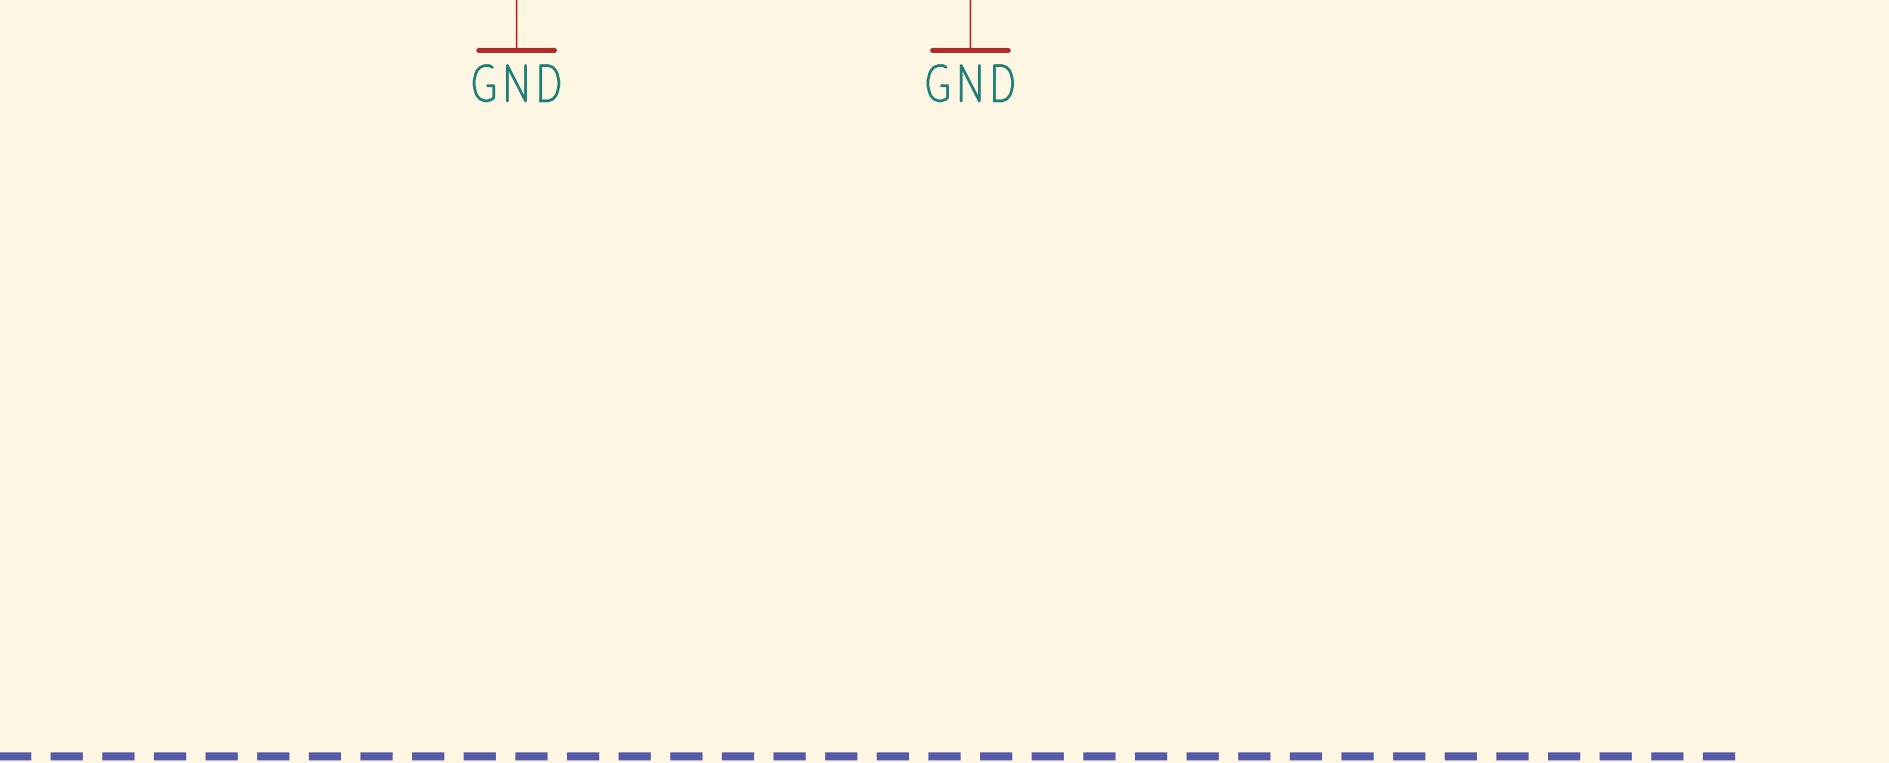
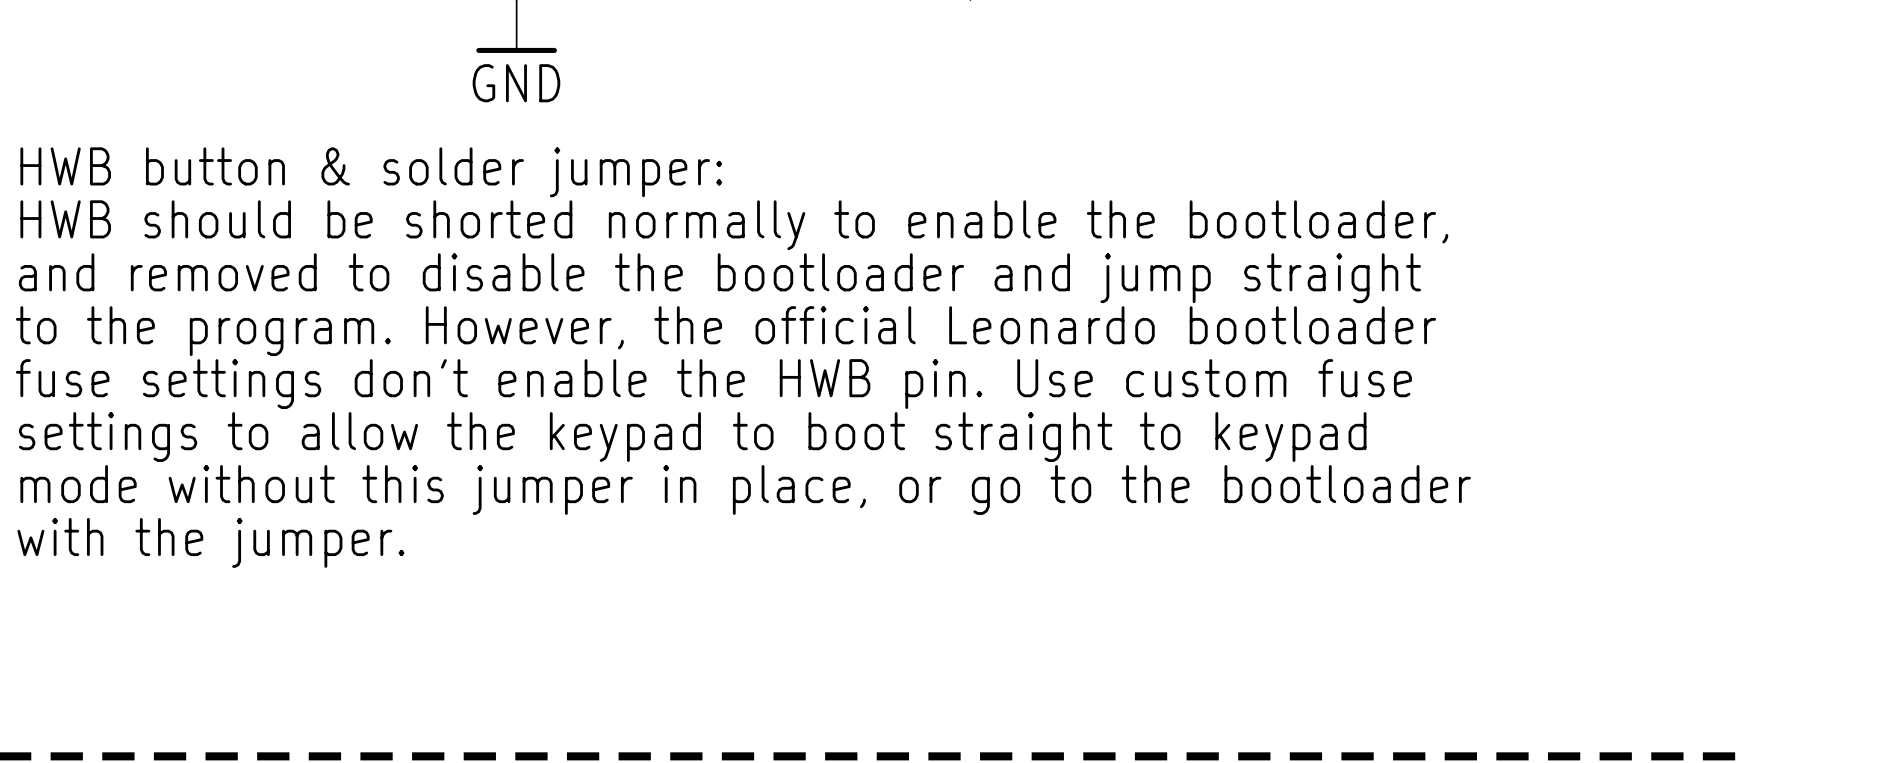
power symbol: GND (970, 26) -> none
text: none -> HWB button & solder jumper: (371, 172)
text: none -> HWB should be shorted normally to enable the bootloader, (734, 225)
text: none -> and removed to disable the bootloader and jump straight (719, 278)
text: none -> to the program. However, the official Leonardo bootloader (725, 331)
text: none -> fuse settings don't enable the HWB pin. Use custom fuse (713, 384)
text: none -> settings to allow the keypad to boot straight to keypad (692, 437)
text: none -> mode without this jumper in place, or go to the bootloader (745, 489)
text: none -> with the jumper. (210, 542)

